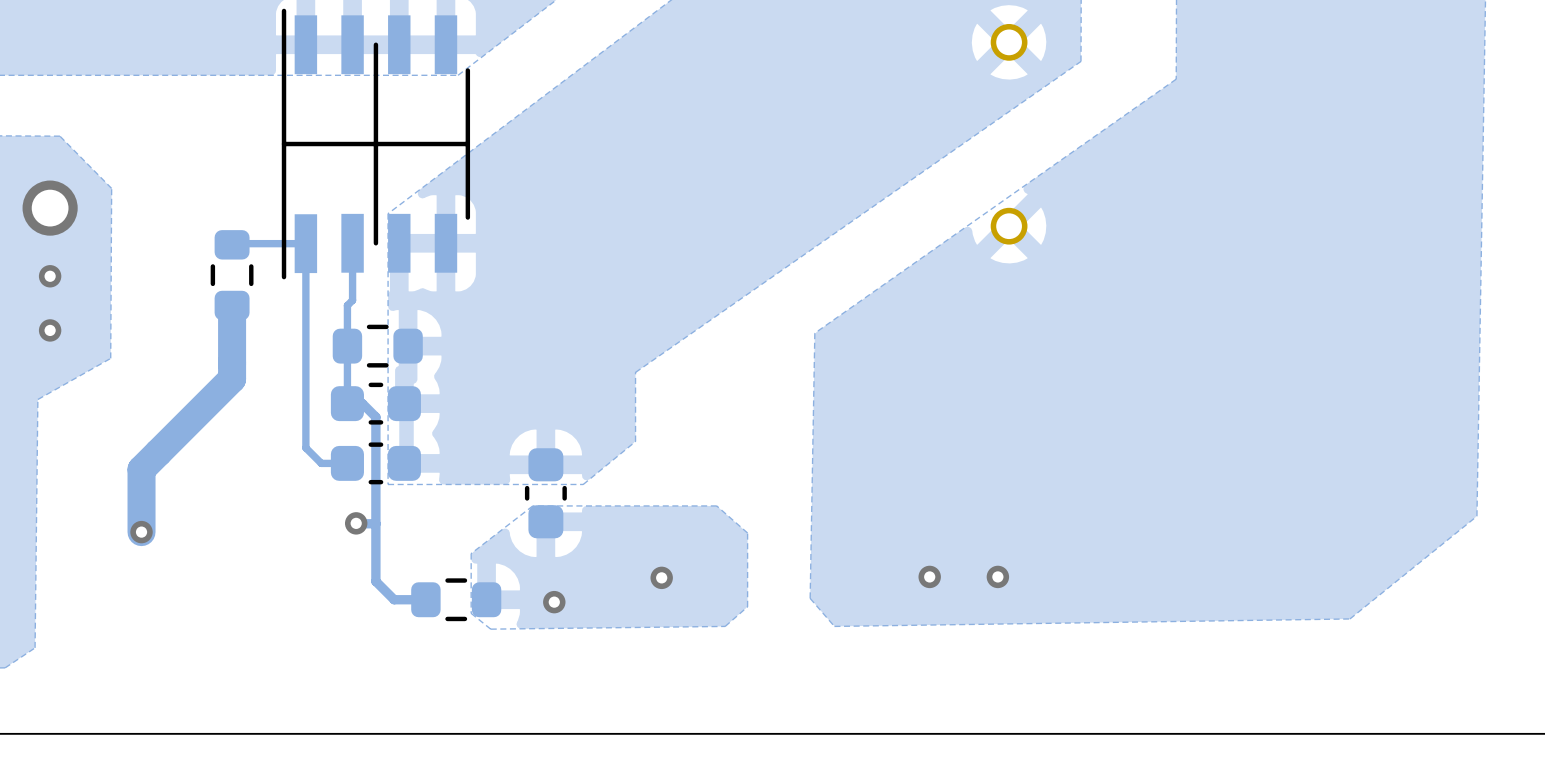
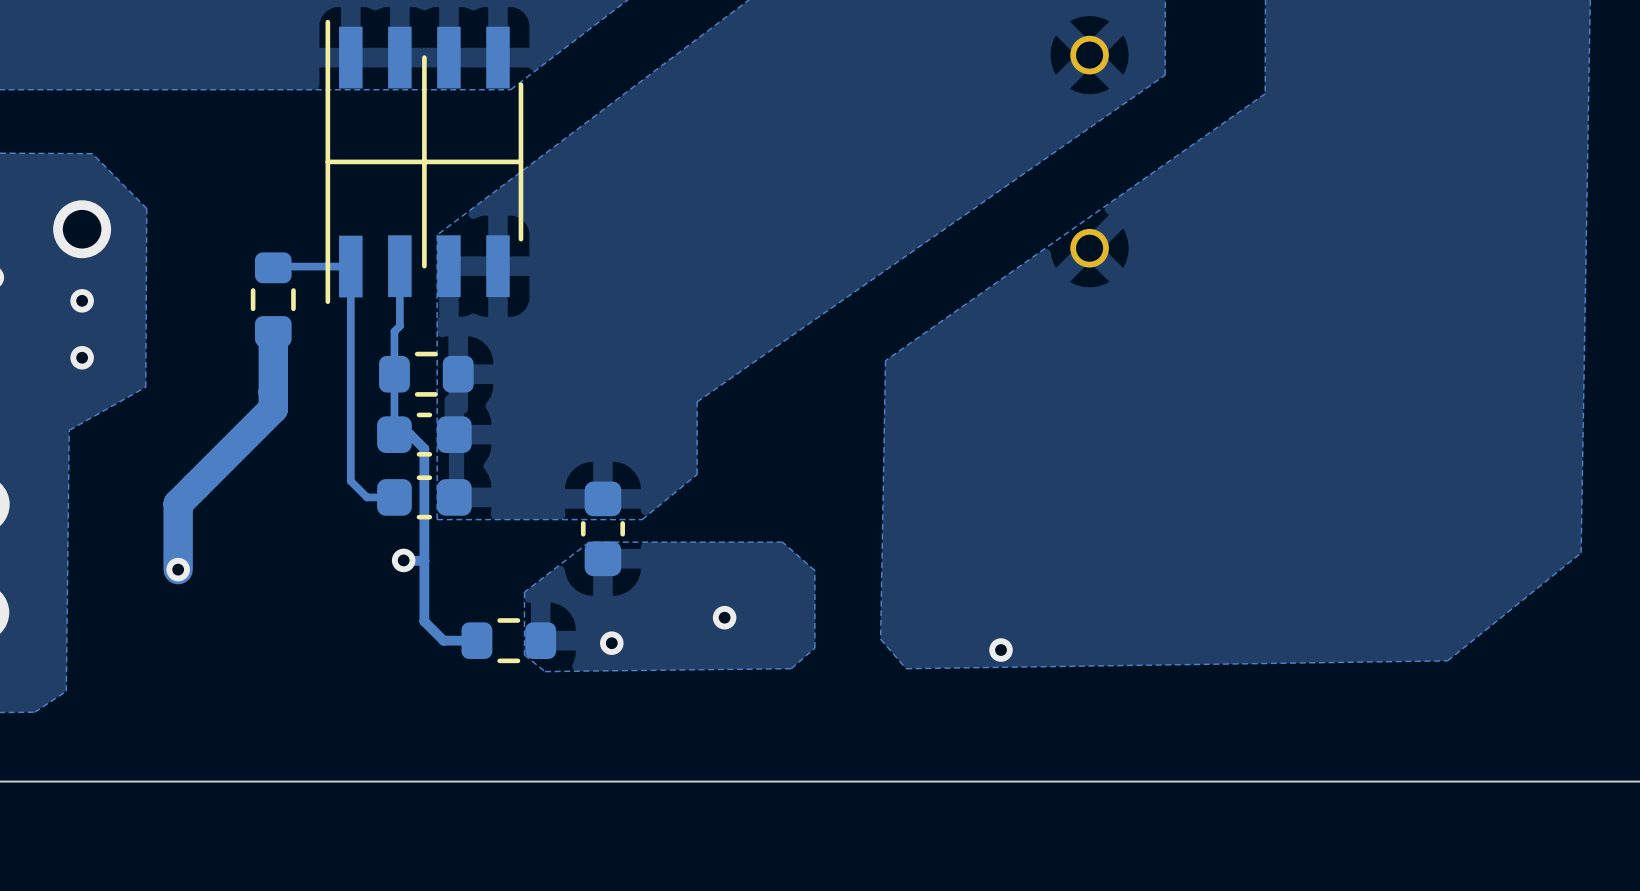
via position: (929, 576) -> (1001, 650)
via: (997, 576) -> none

